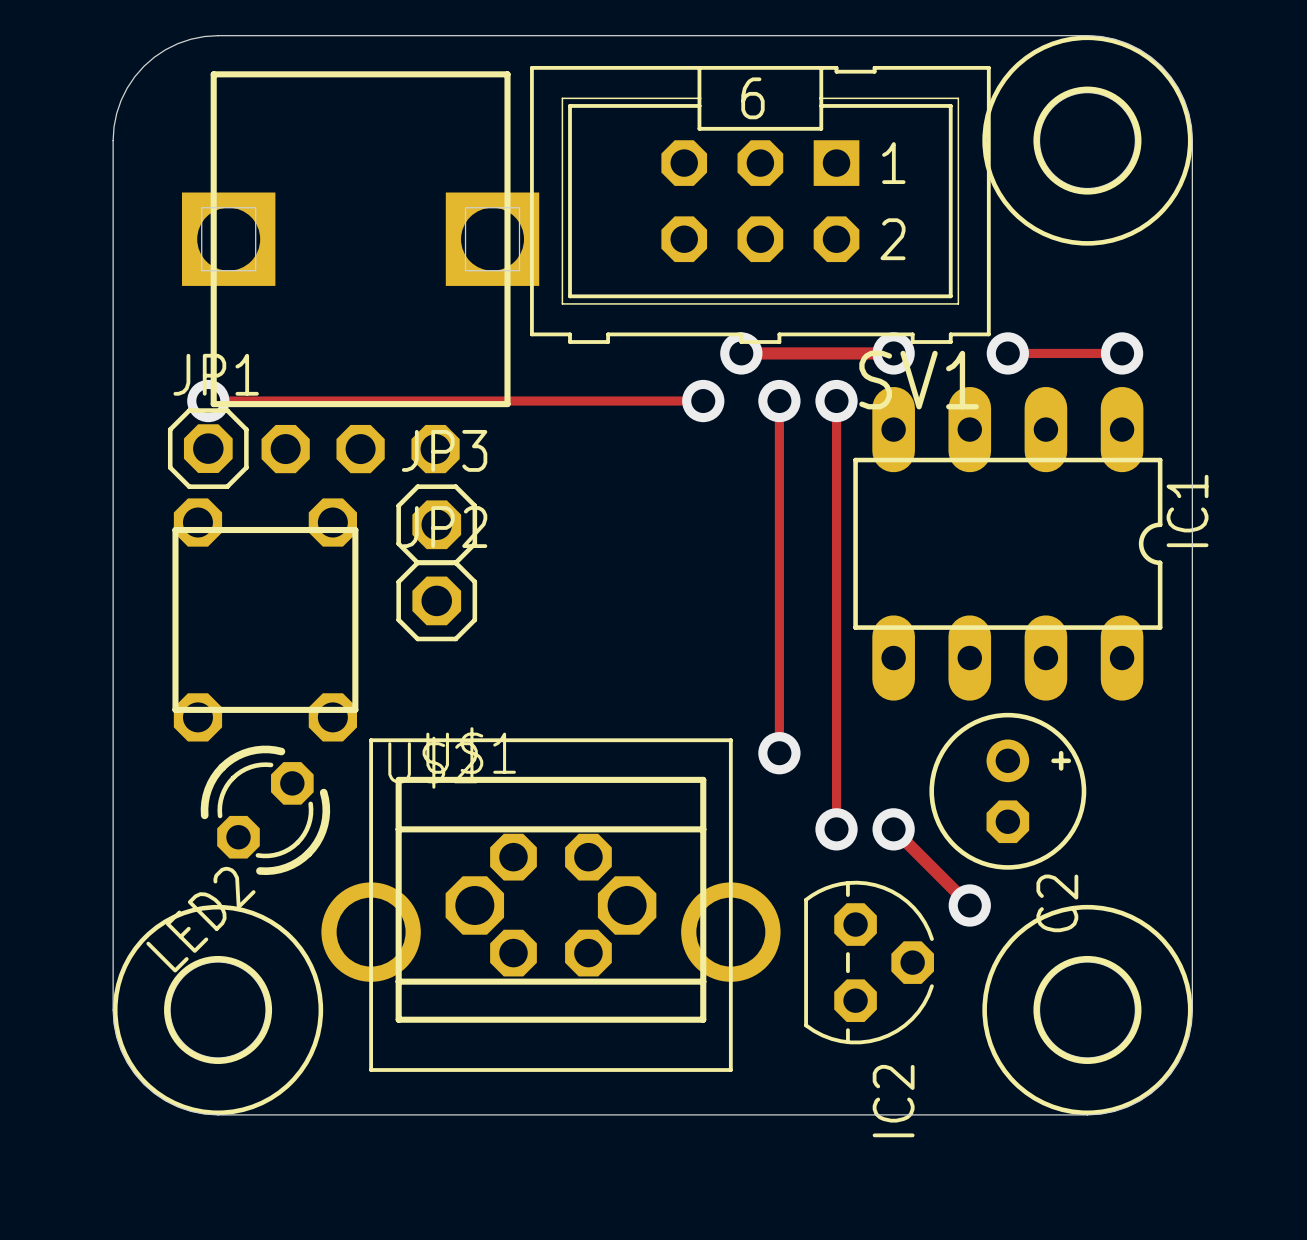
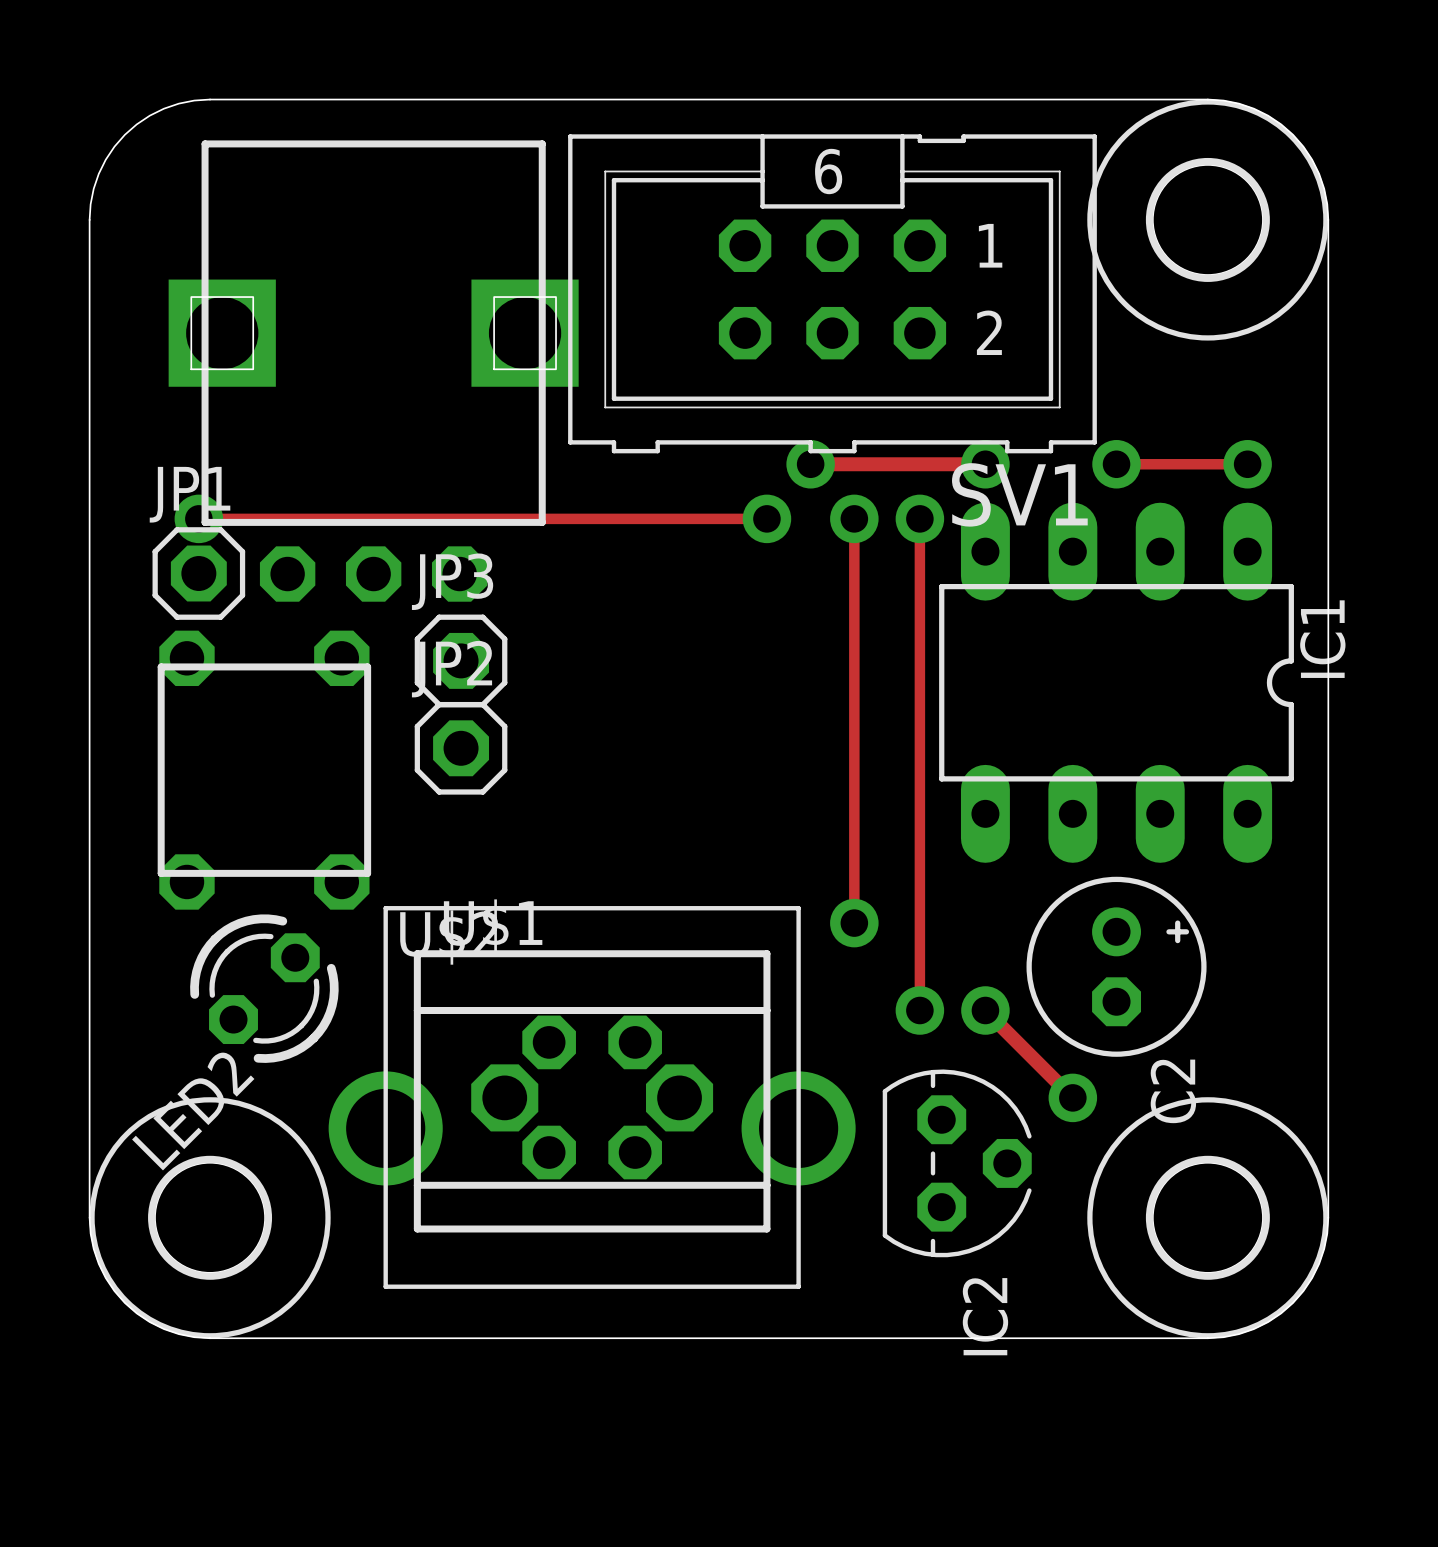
SV1 footprint: [530, 65, 991, 344] -> [568, 134, 1097, 454]

